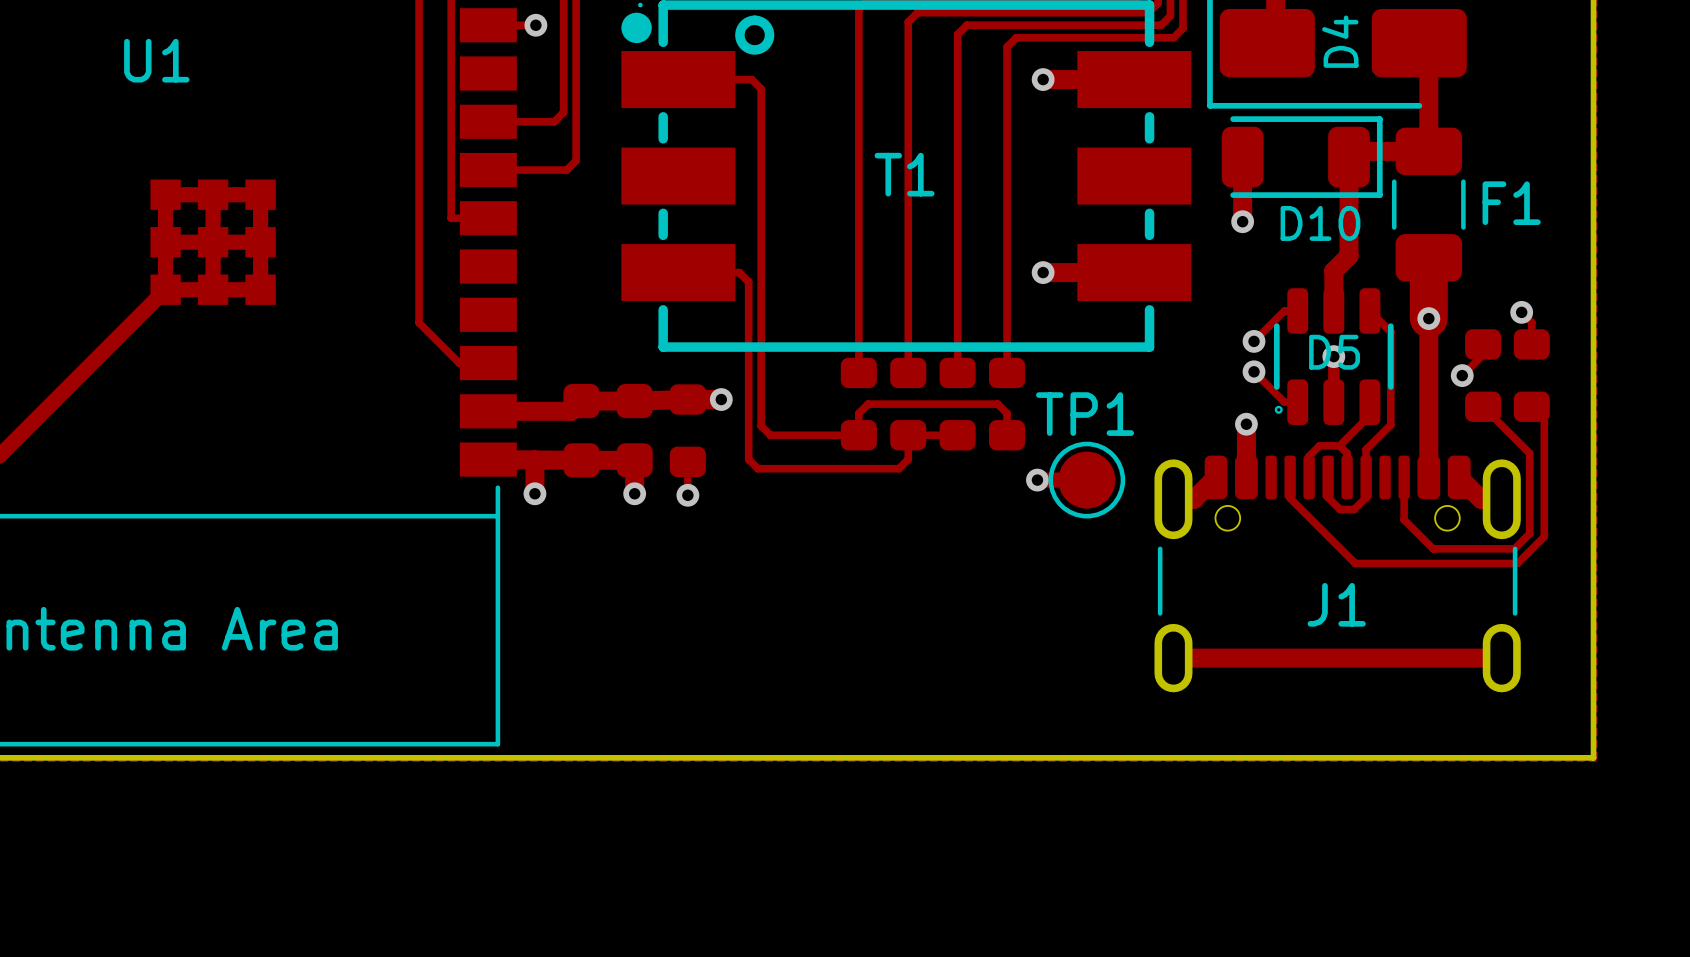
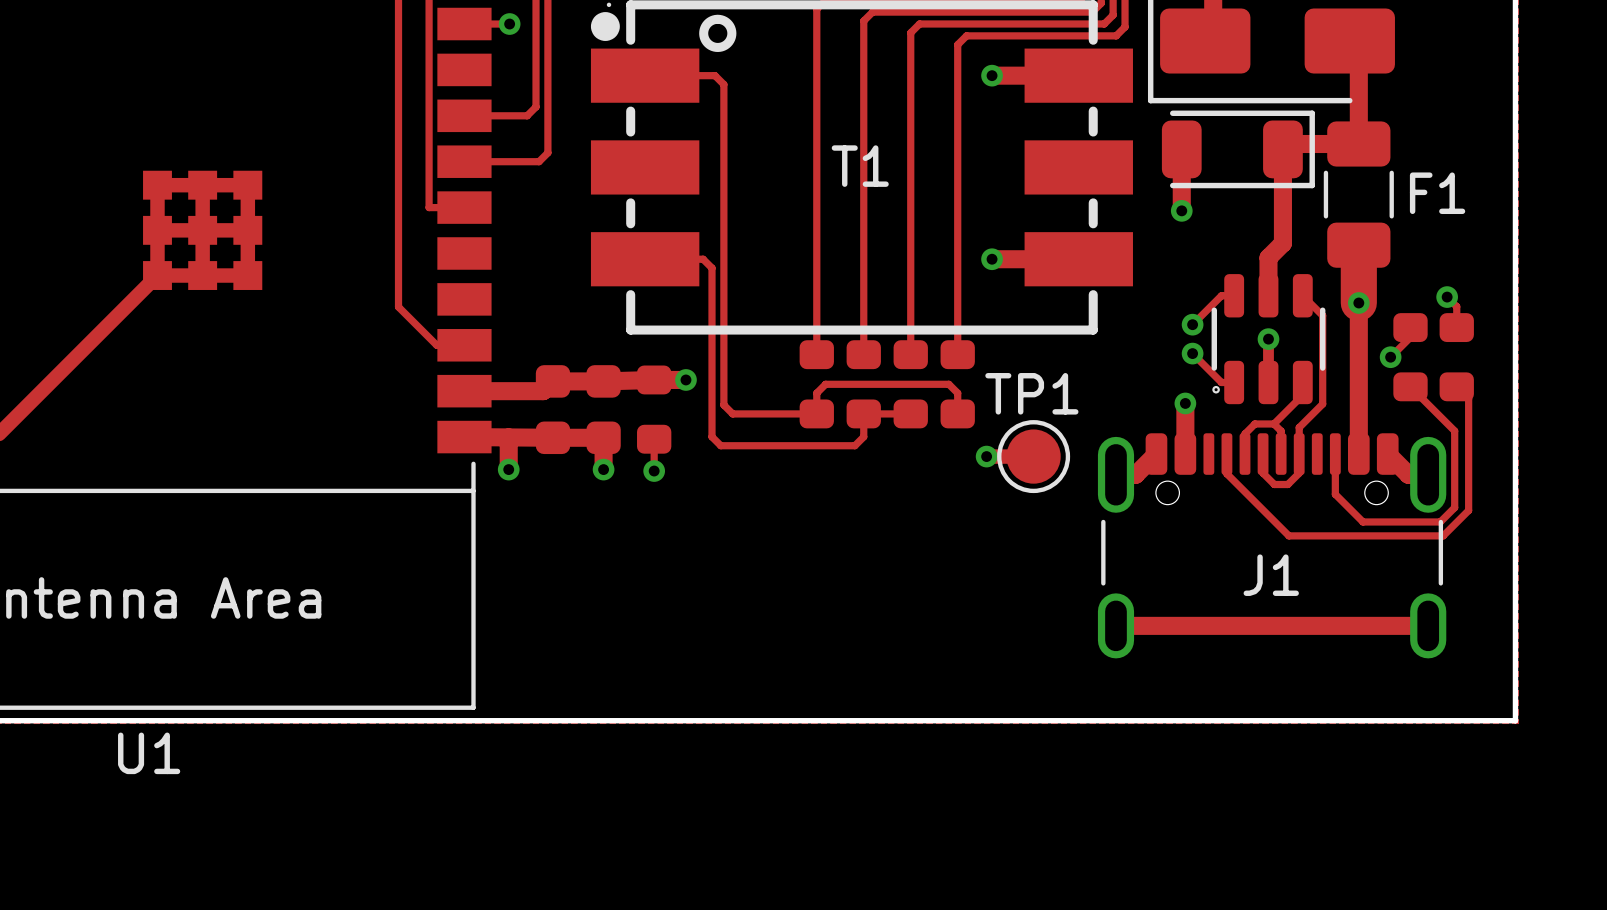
D4 name: D4 (1340, 41) -> none
U1 name position: U1 (156, 60) -> U1 (149, 753)
D10 name: D10 (1320, 223) -> none
D5 name: D5 (1334, 352) -> none

